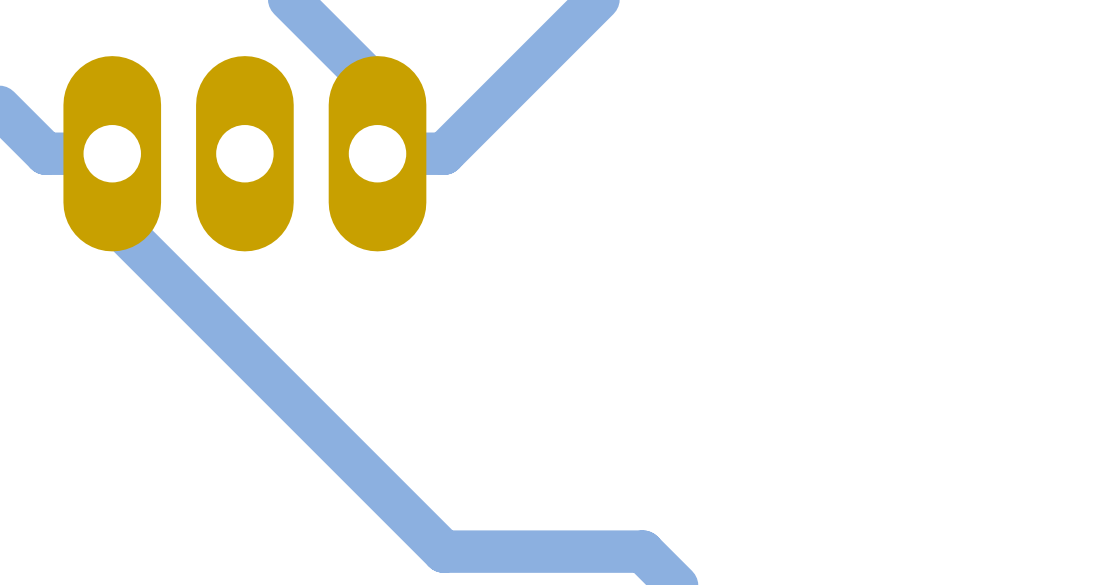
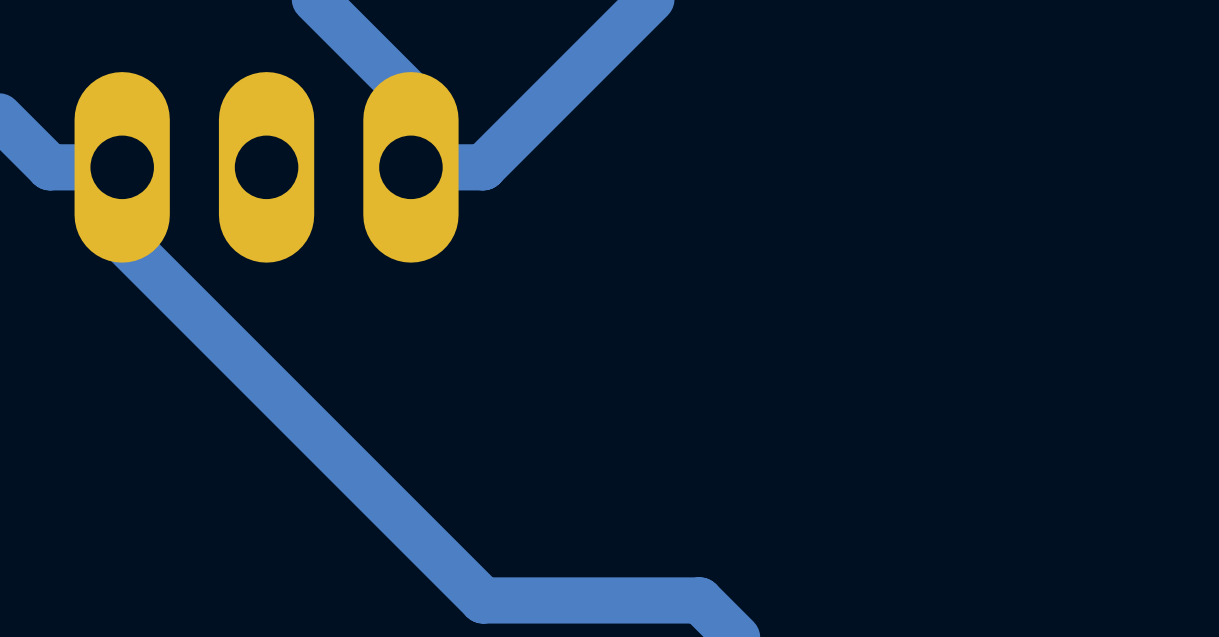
part footprint: [63, 56, 427, 252] -> [74, 72, 459, 263]

